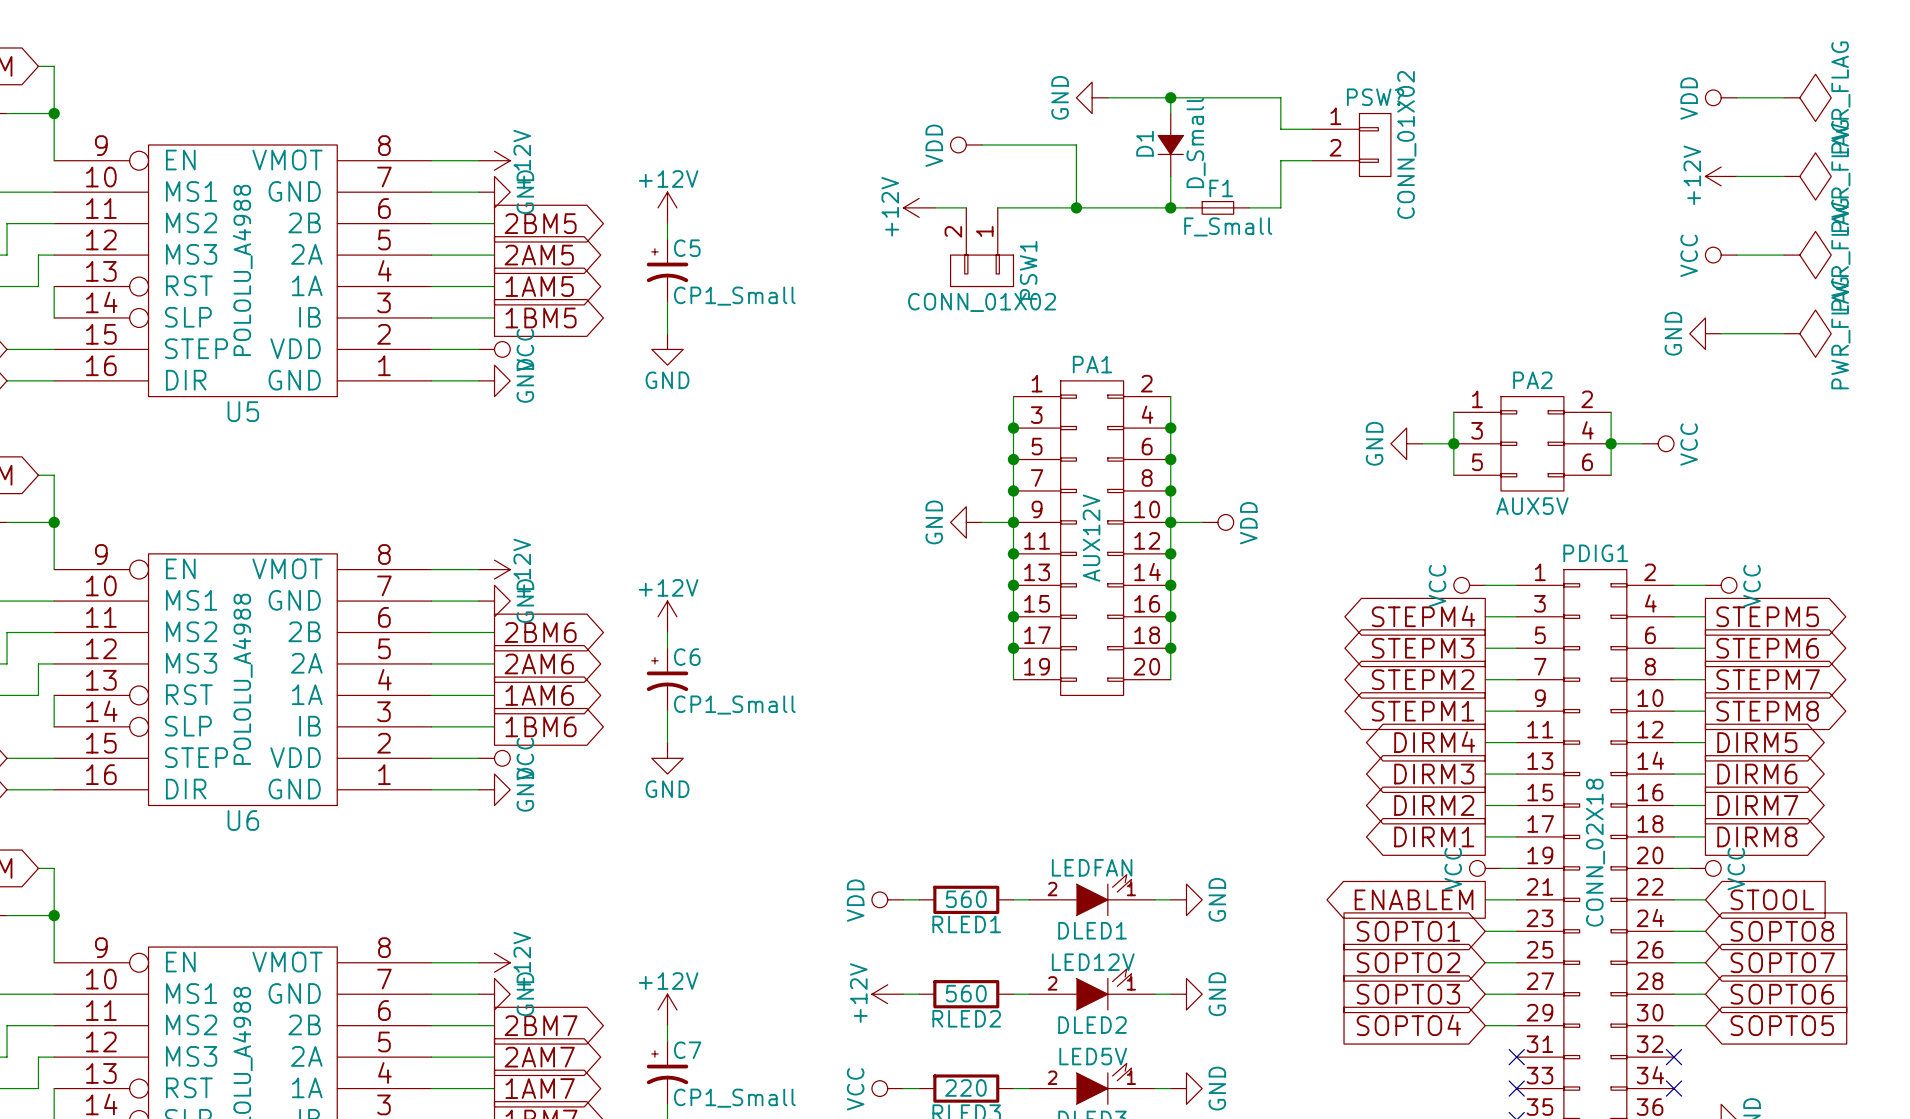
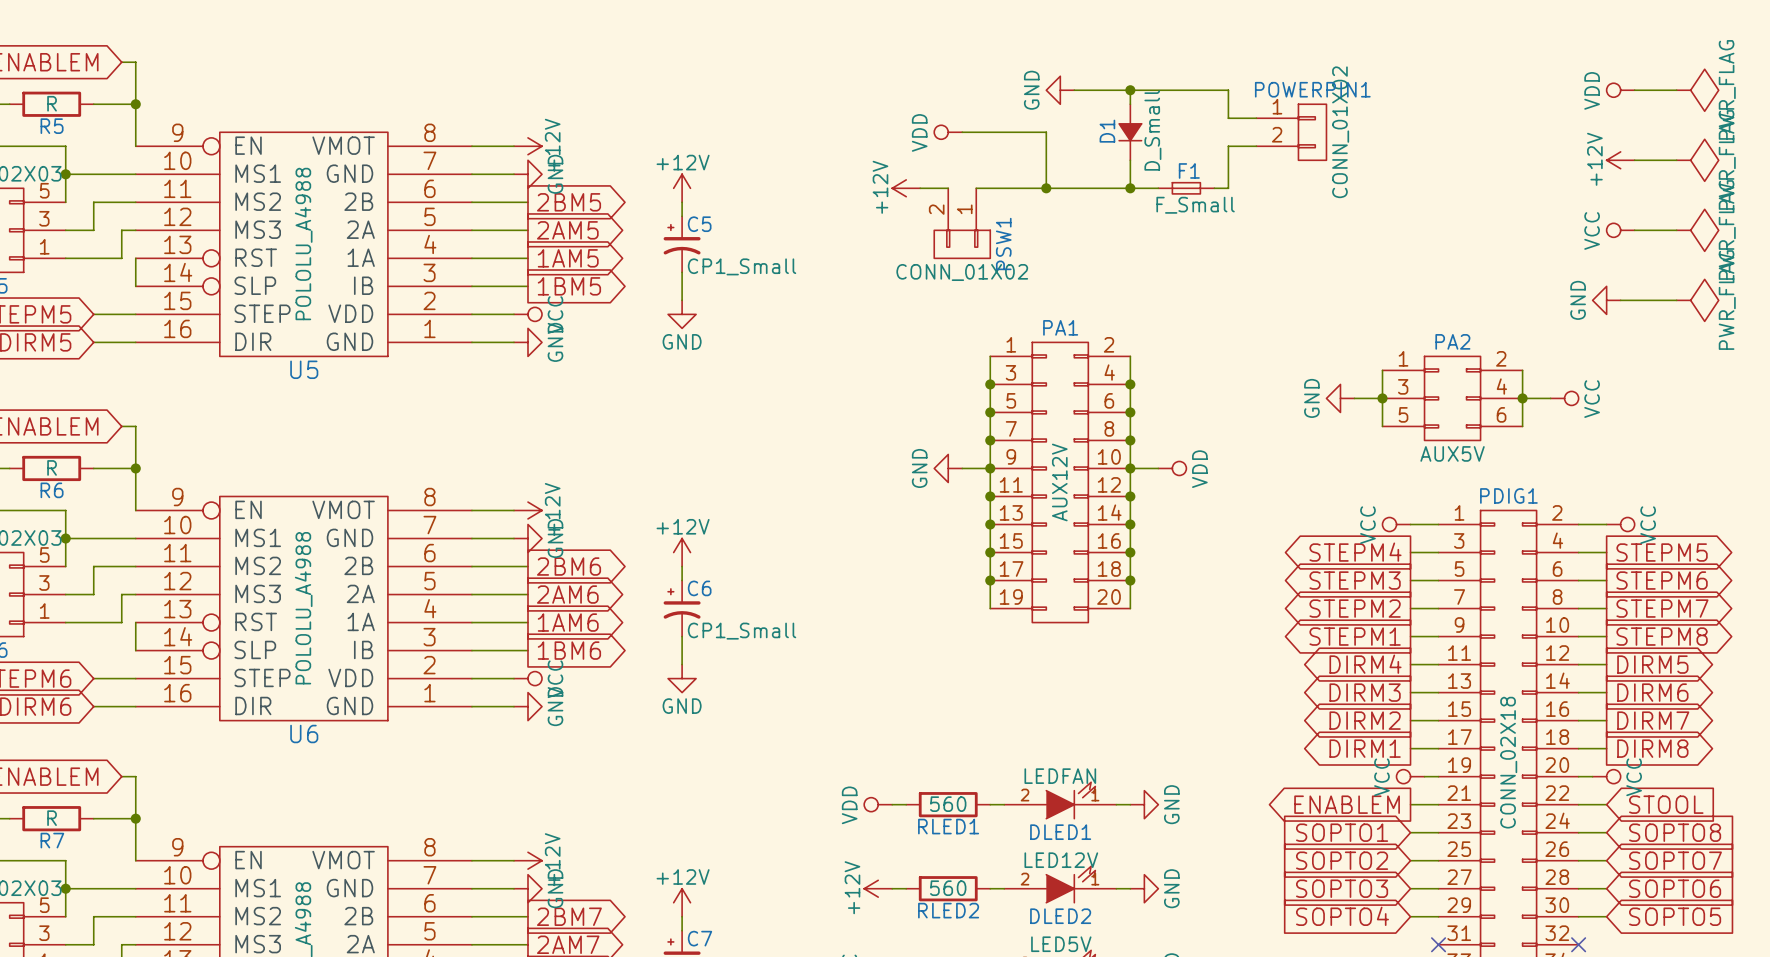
PSW? name: PSW? (1375, 97) -> POWERPIN1 (1312, 89)
F1 position: (1217, 207) -> (1186, 188)

